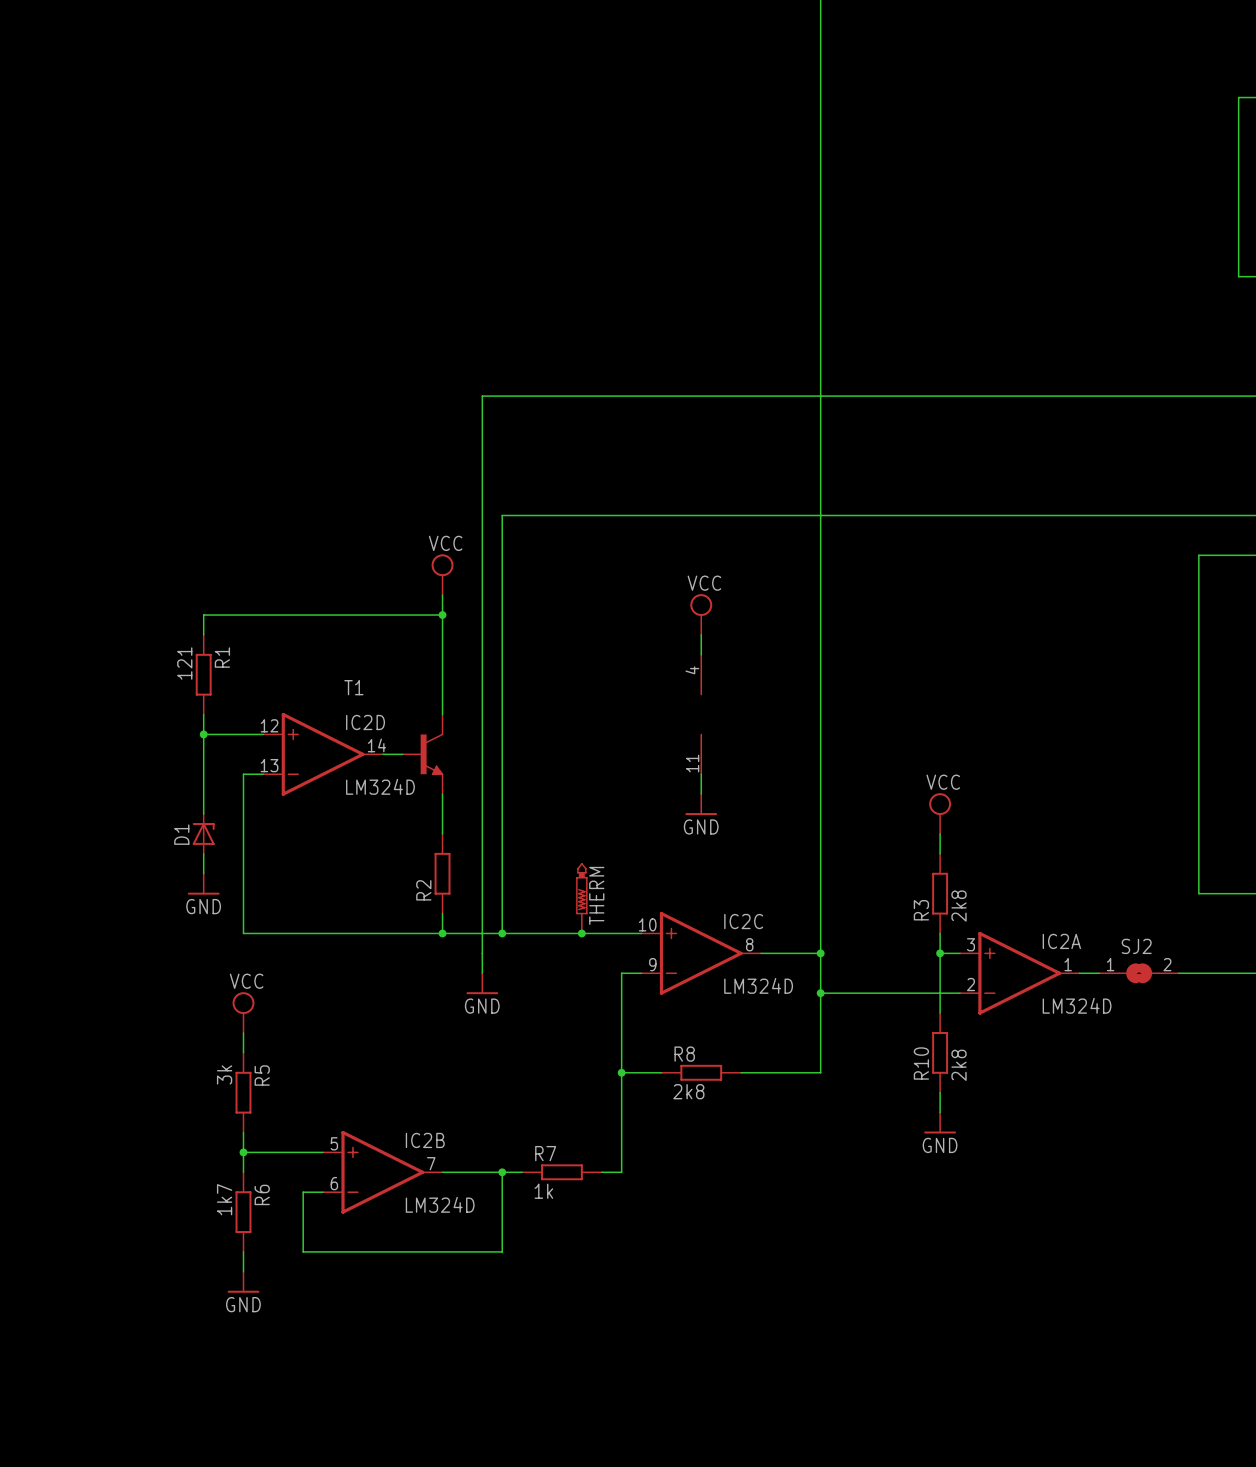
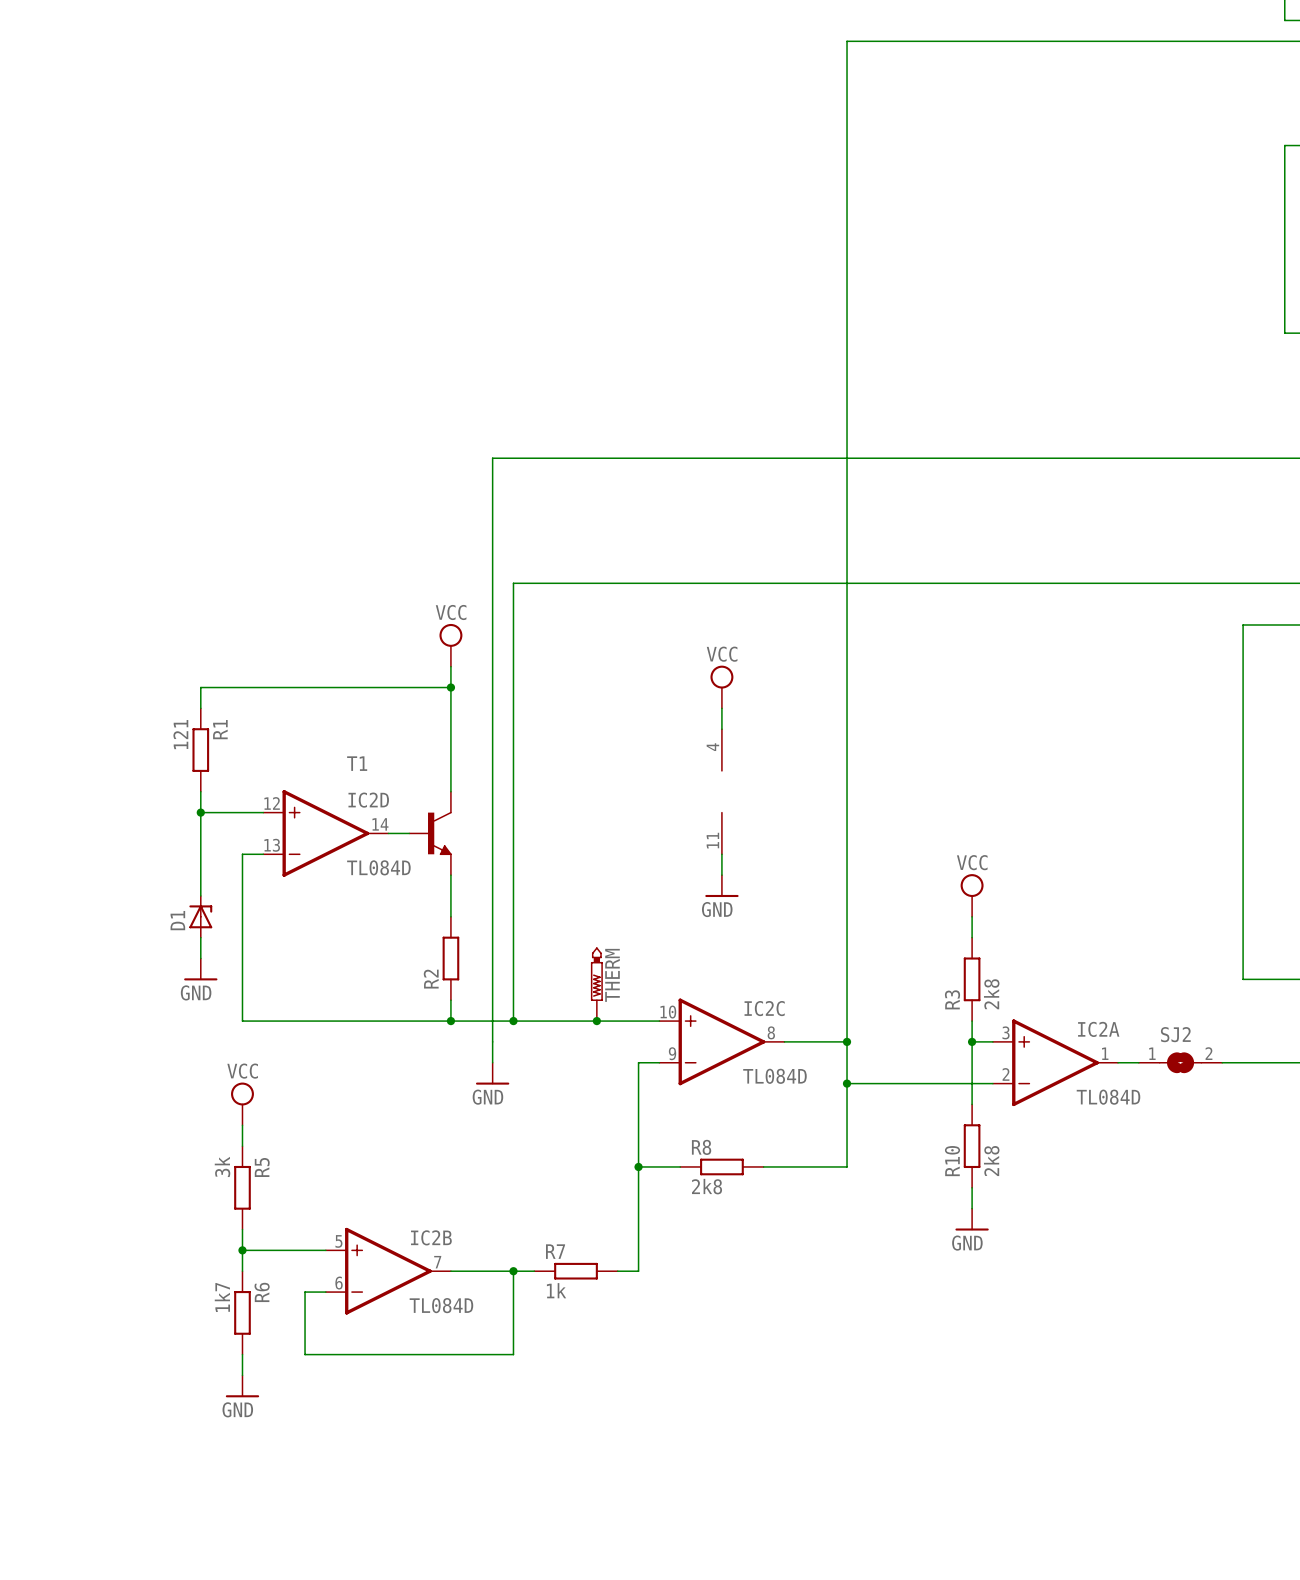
IC2D value: LM324D (380, 786) -> TL084D (378, 867)
IC2C value: LM324D (758, 985) -> TL084D (774, 1076)
IC2A value: LM324D (1077, 1005) -> TL084D (1108, 1097)
IC2B value: LM324D (440, 1204) -> TL084D (441, 1305)

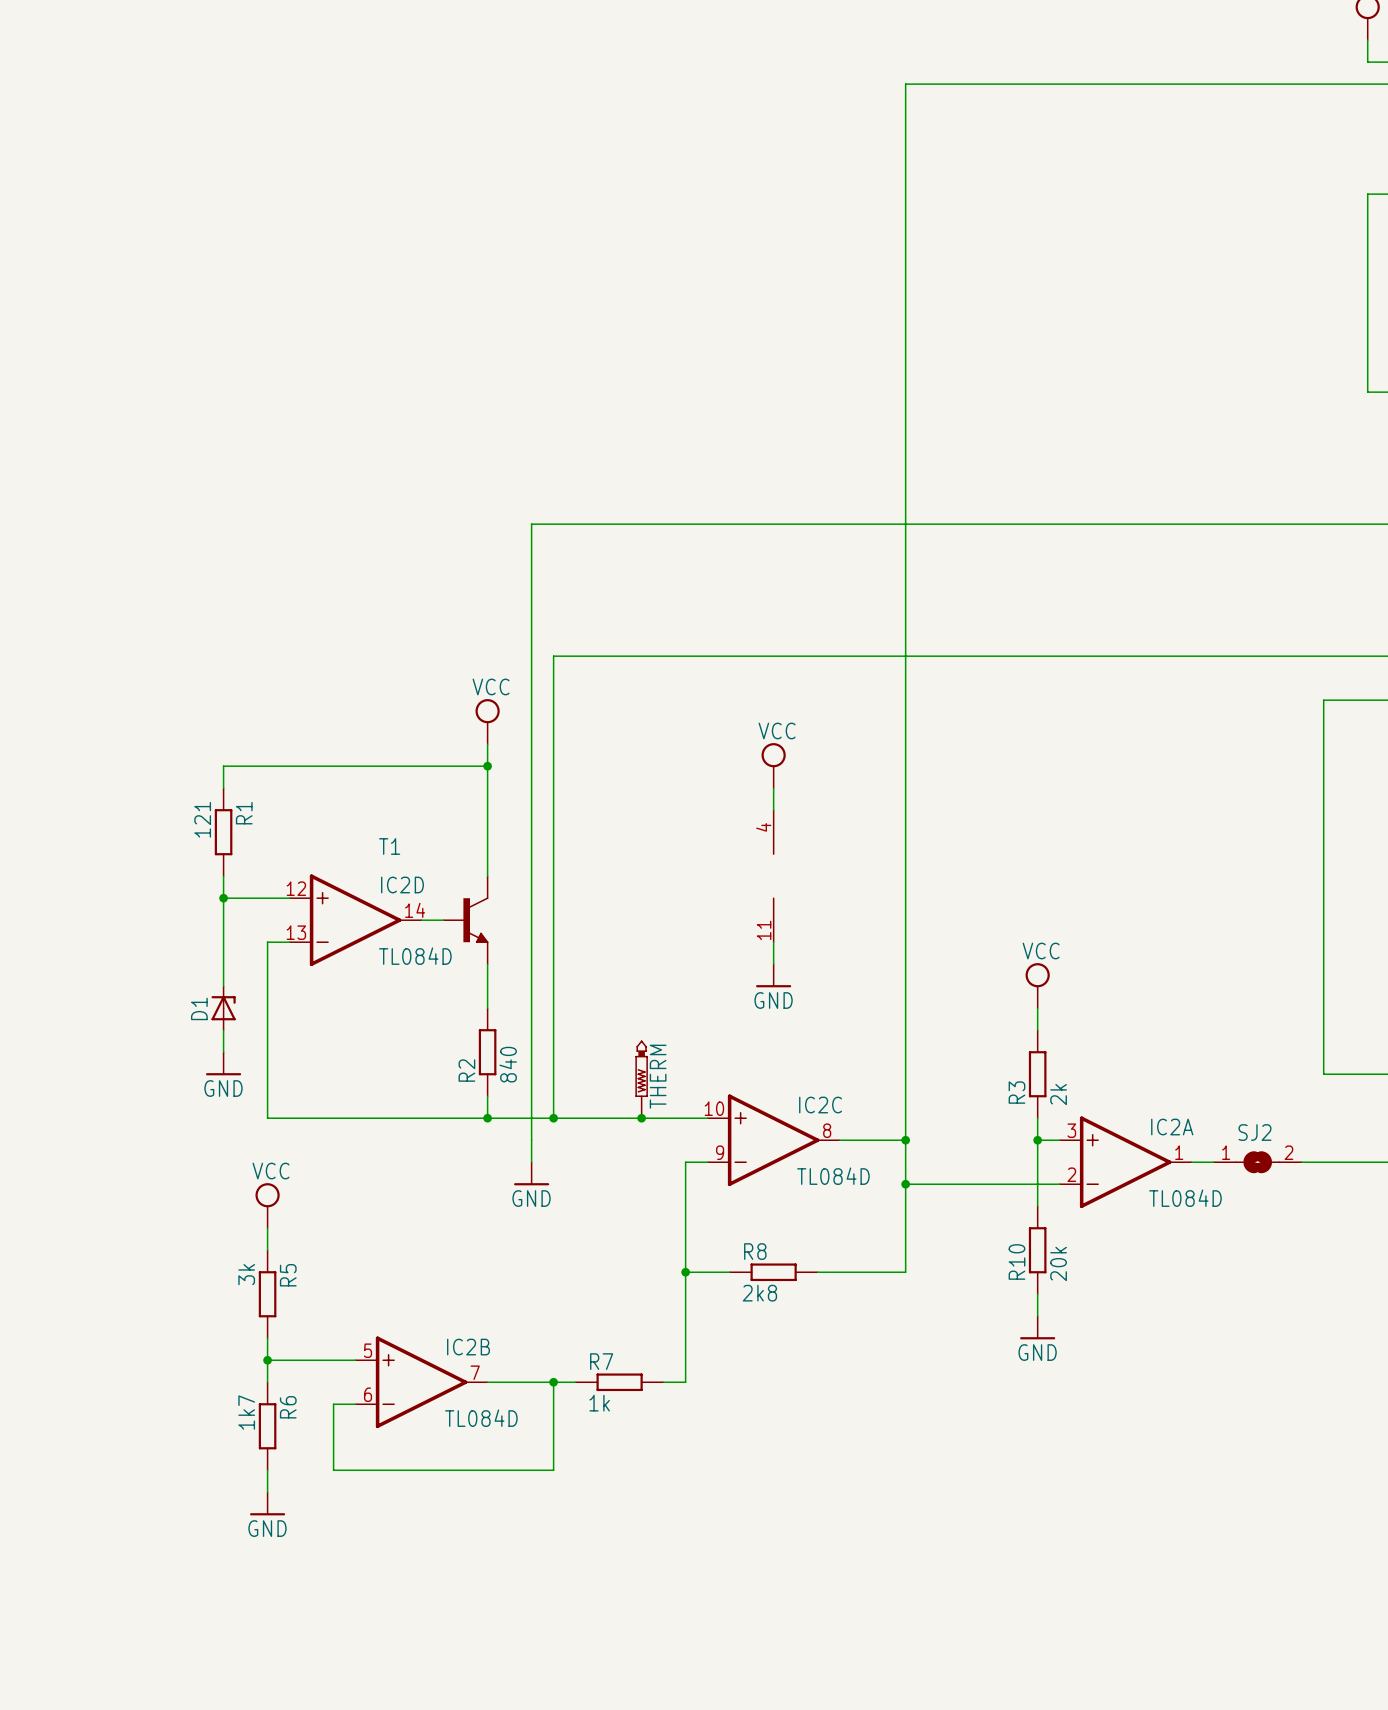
R2 value: none -> 840 (508, 1064)
R3 value: 2k8 (991, 994) -> 2k (1058, 1094)
R10 value: 2k8 (991, 1161) -> 20k (1058, 1263)

